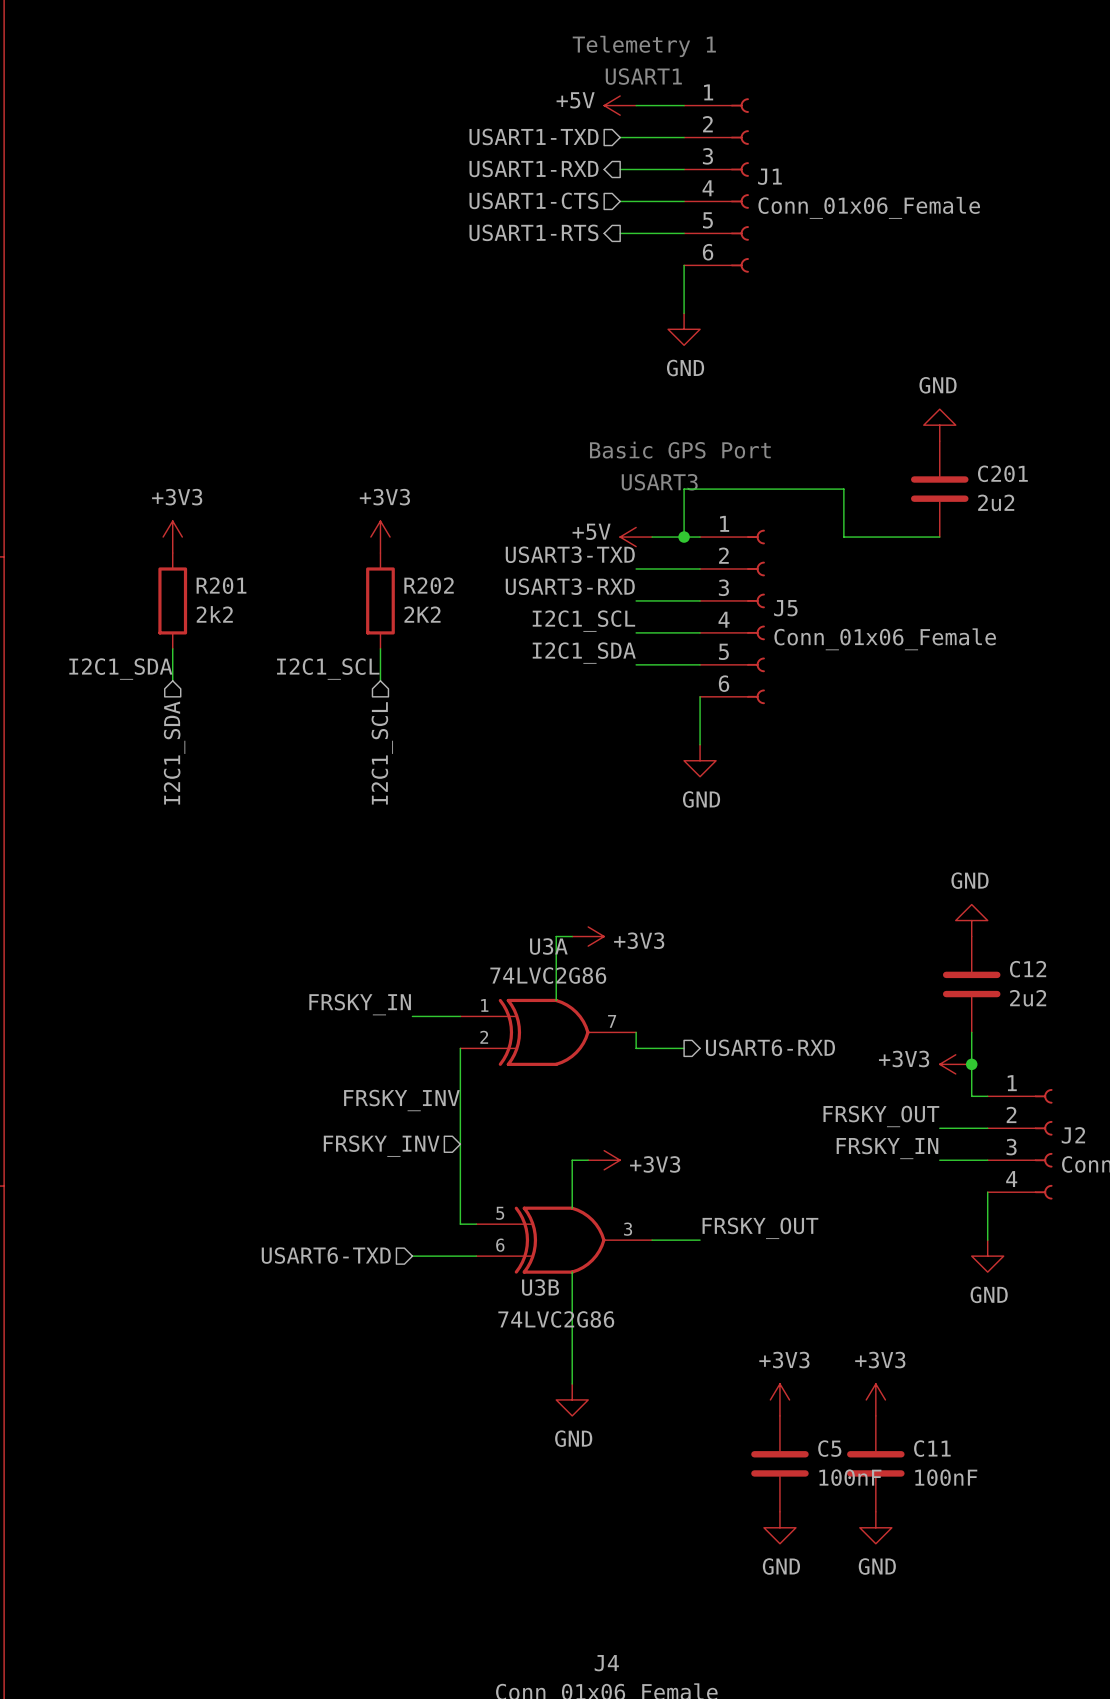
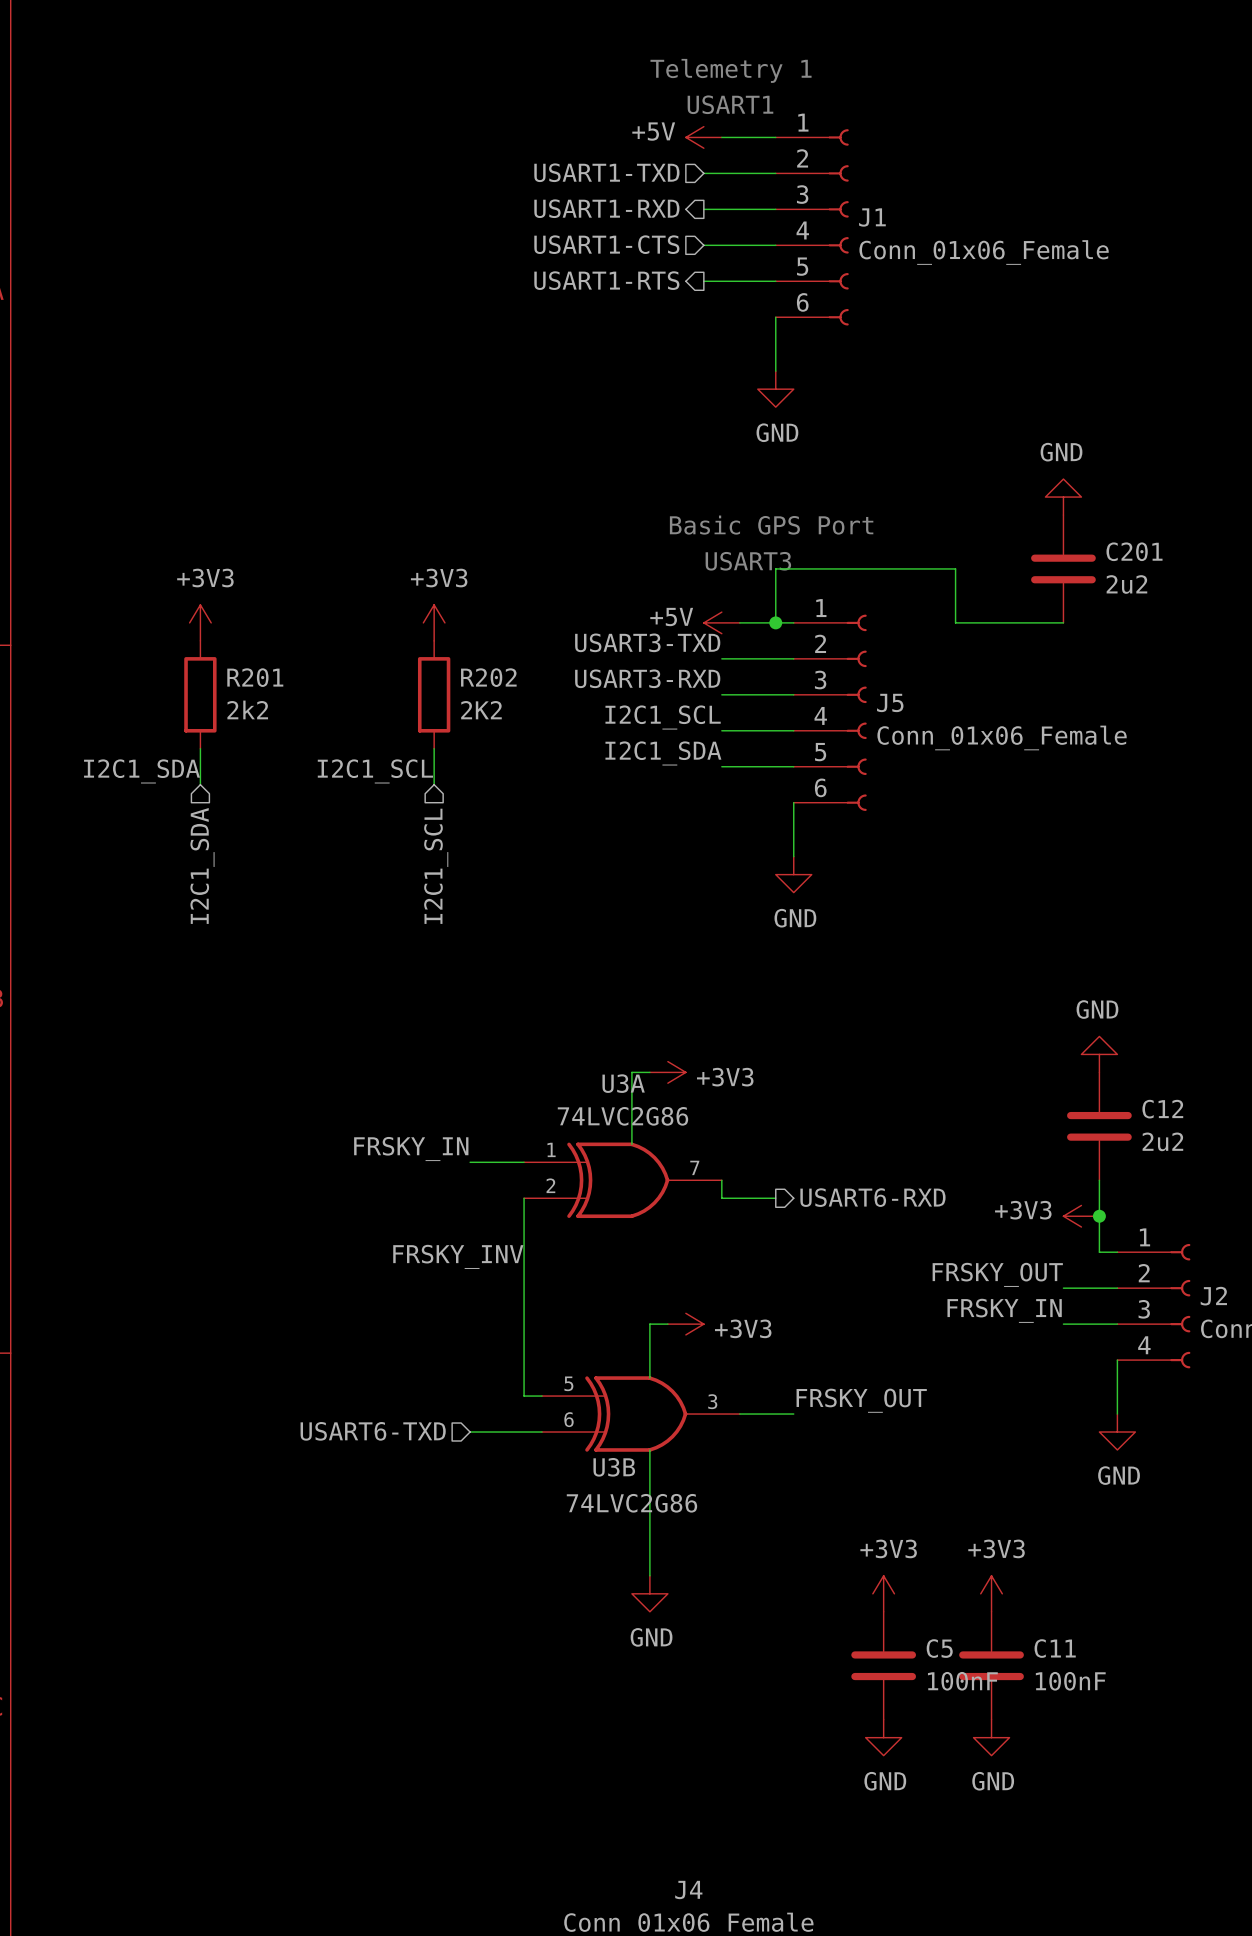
hierarchical label: FRSKY_INV (381, 1146) -> none

